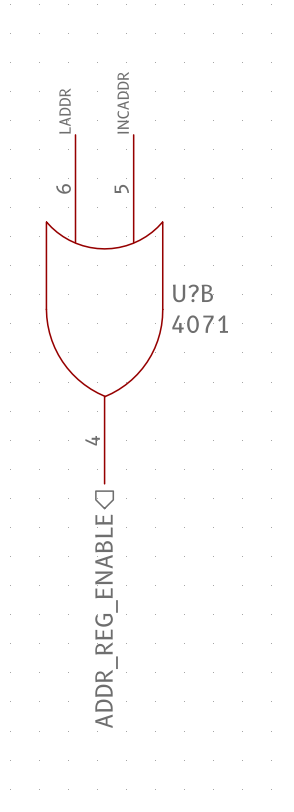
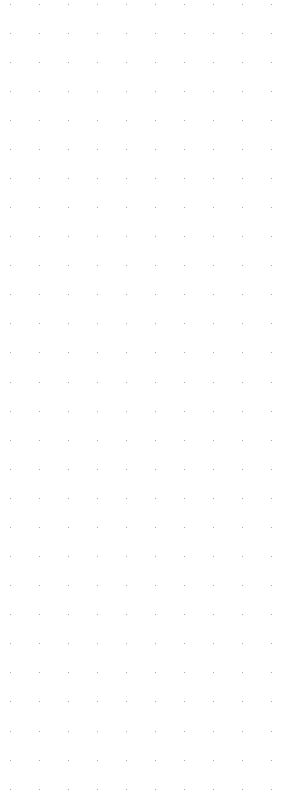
label: INCADDR (123, 102) -> none
label: LADDR (65, 111) -> none
U?B: 4071 (104, 309) -> none
hierarchical label: ADDR_REG_ENABLE (106, 621) -> none

